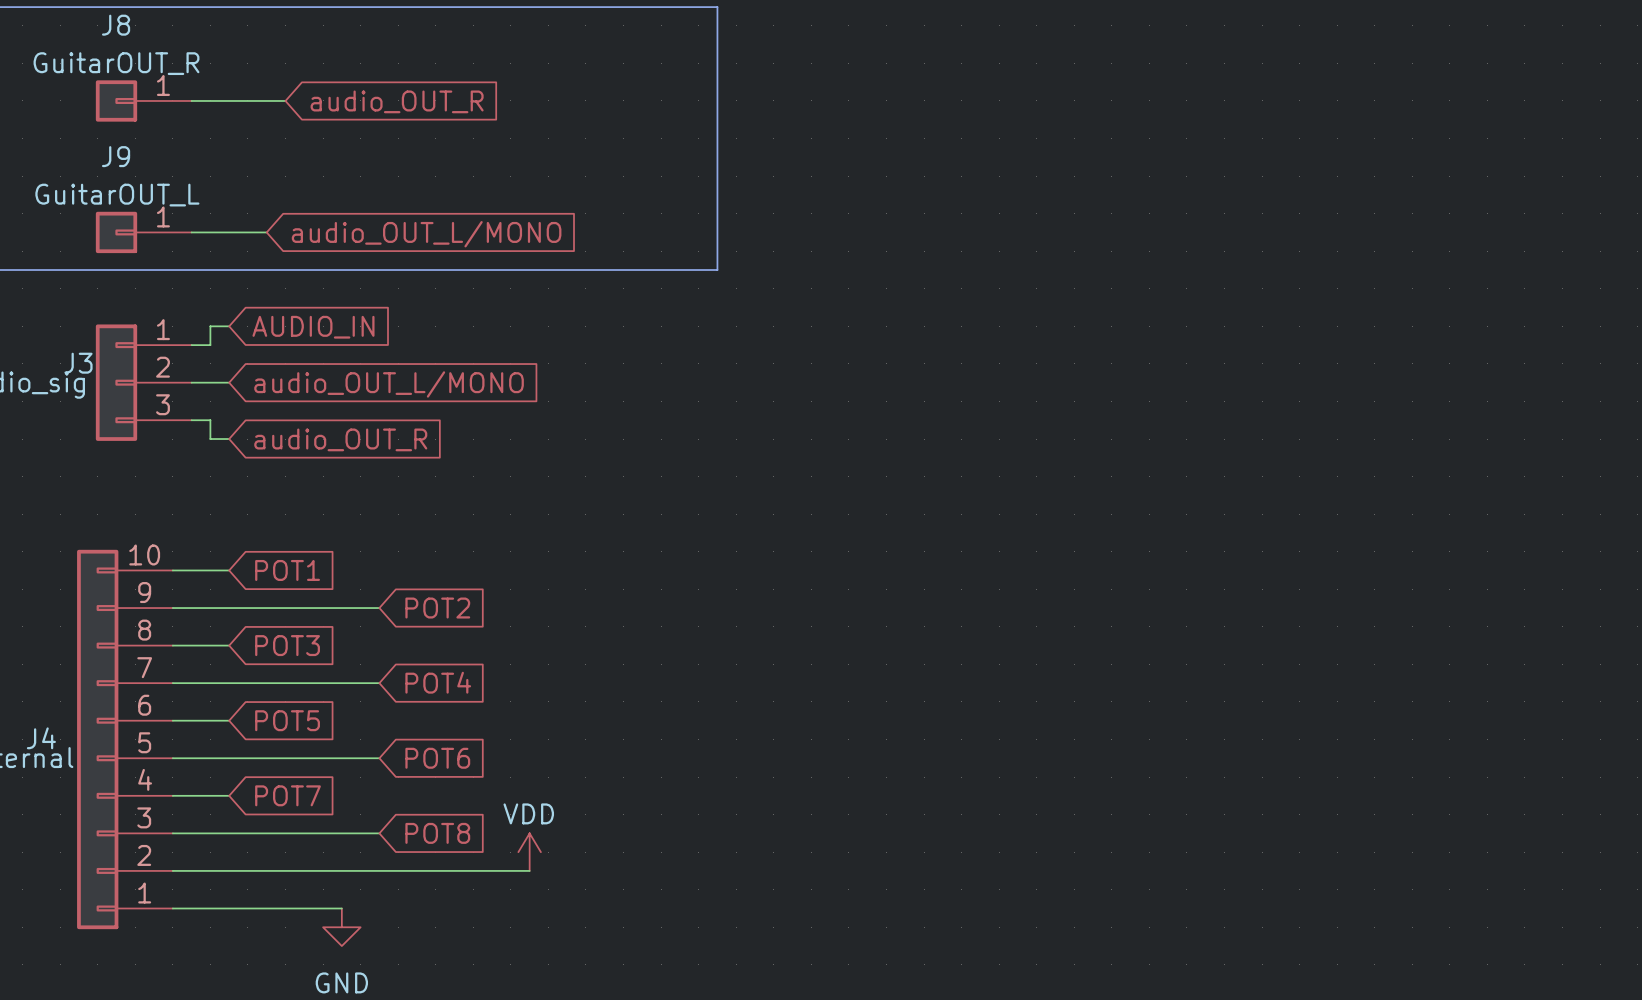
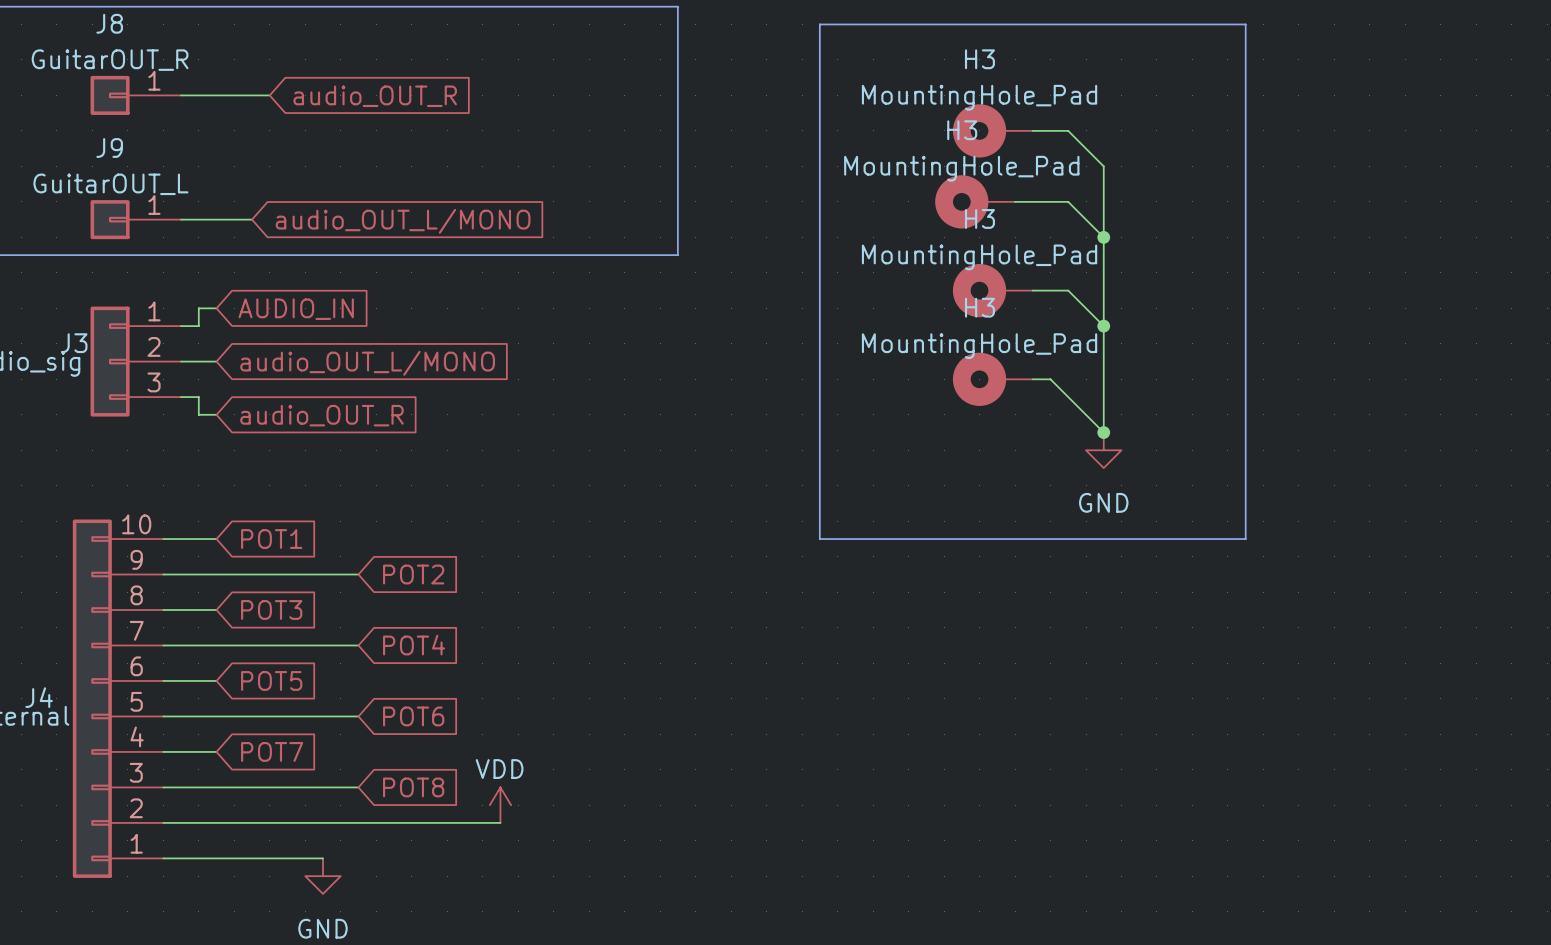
line: none -> (819, 24) (1245, 24) (1245, 539) (819, 539) (819, 24)
H3: none -> MountingHole_Pad (992, 130)
wire: none -> (1032, 130) (1068, 130) (1103, 166) (1103, 432) (1050, 379) (1032, 379)
H3: none -> MountingHole_Pad (975, 201)
wire: none -> (1015, 201) (1068, 201) (1103, 237)
junction: none -> (1103, 237)
H3: none -> MountingHole_Pad (992, 290)
wire: none -> (1032, 290) (1068, 290) (1103, 326)
junction: none -> (1103, 326)
H3: none -> MountingHole_Pad (992, 379)
junction: none -> (1103, 432)
power symbol: none -> GND (1103, 450)

